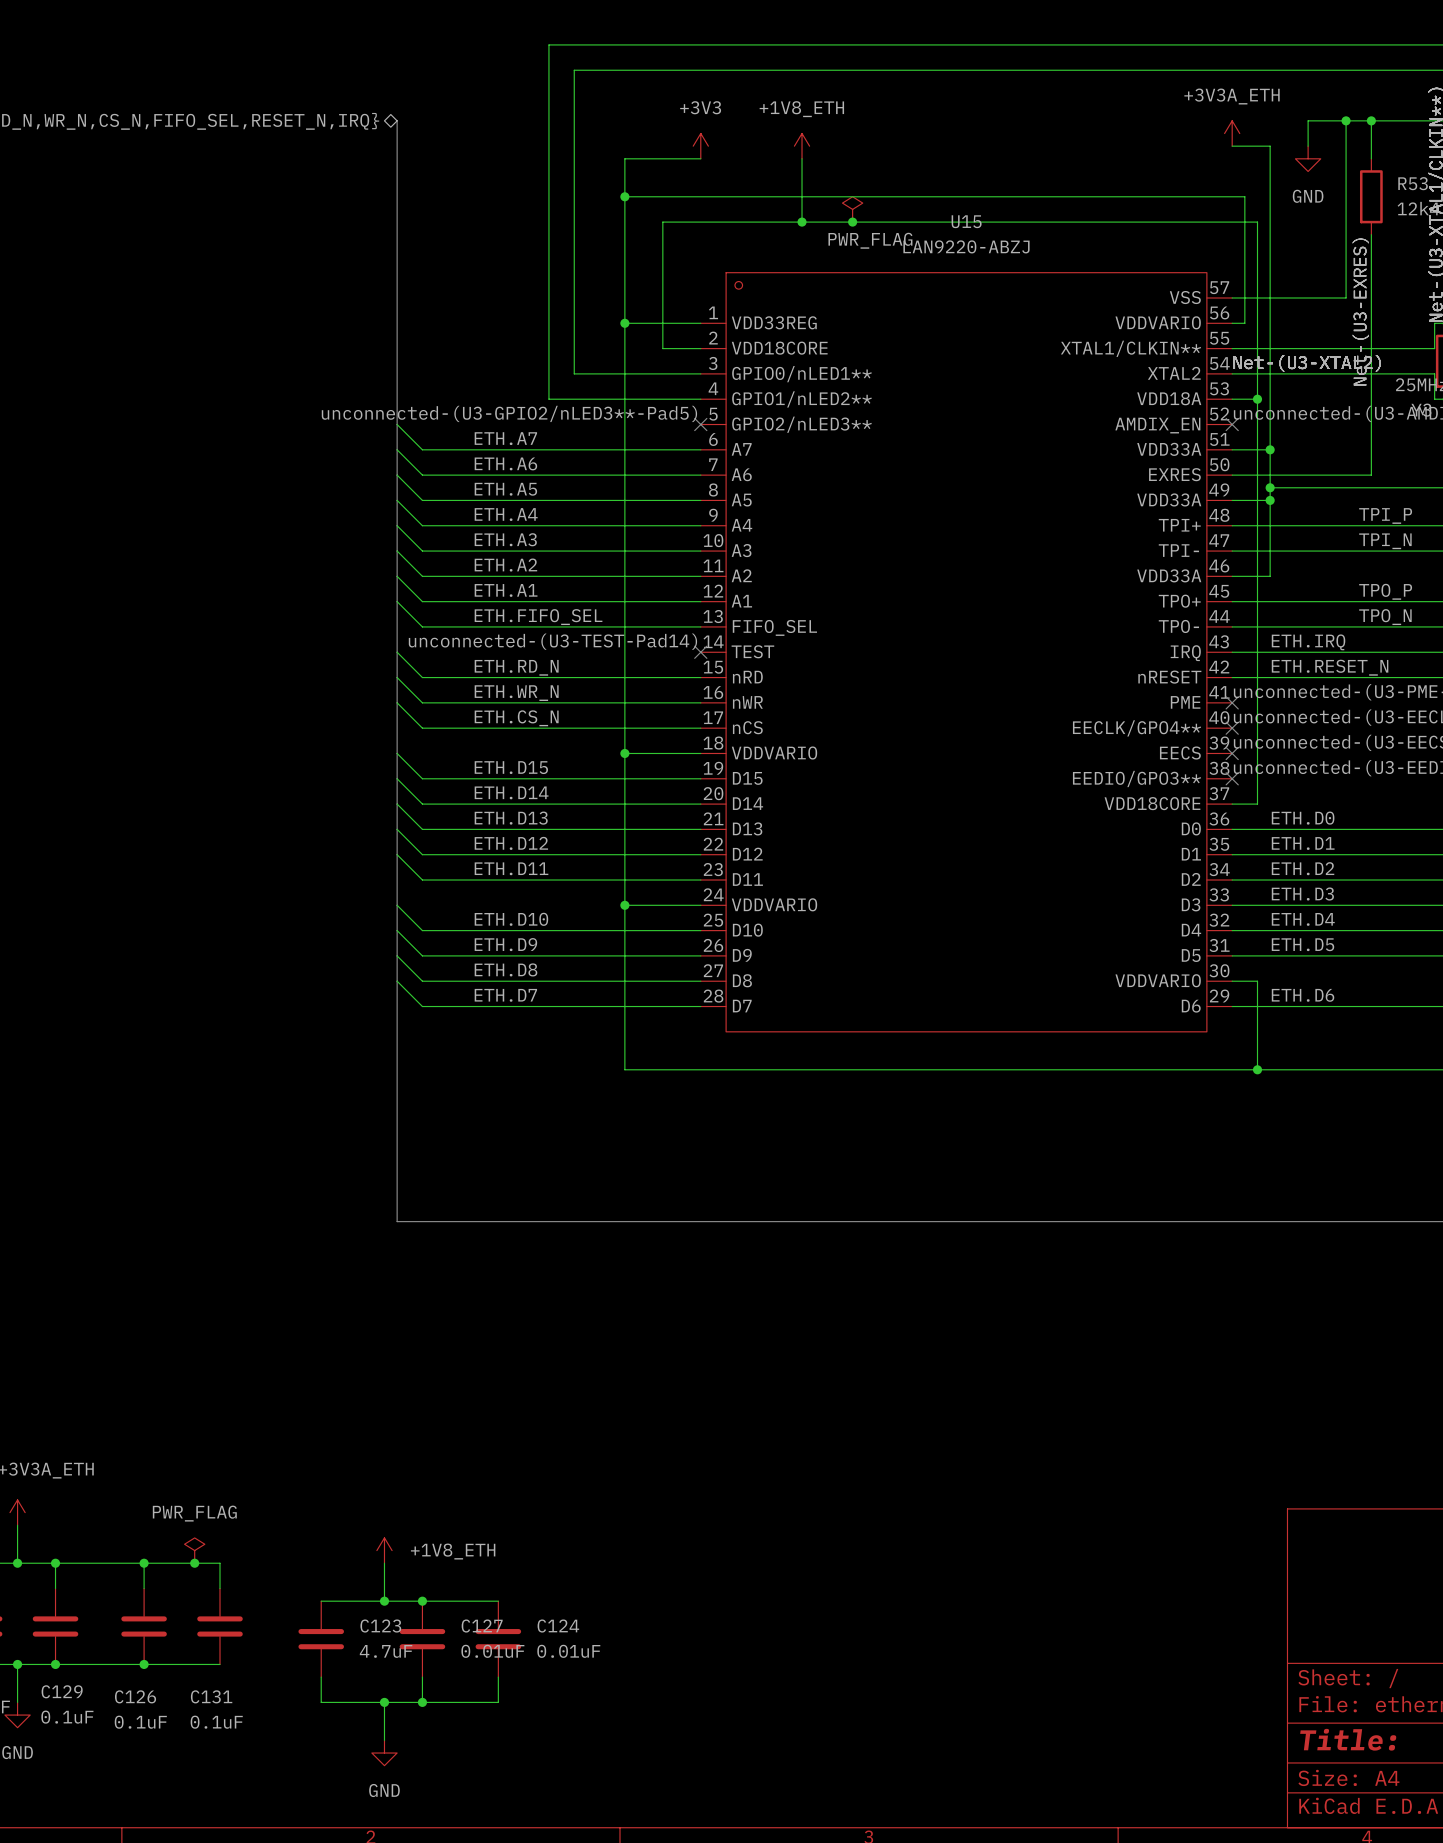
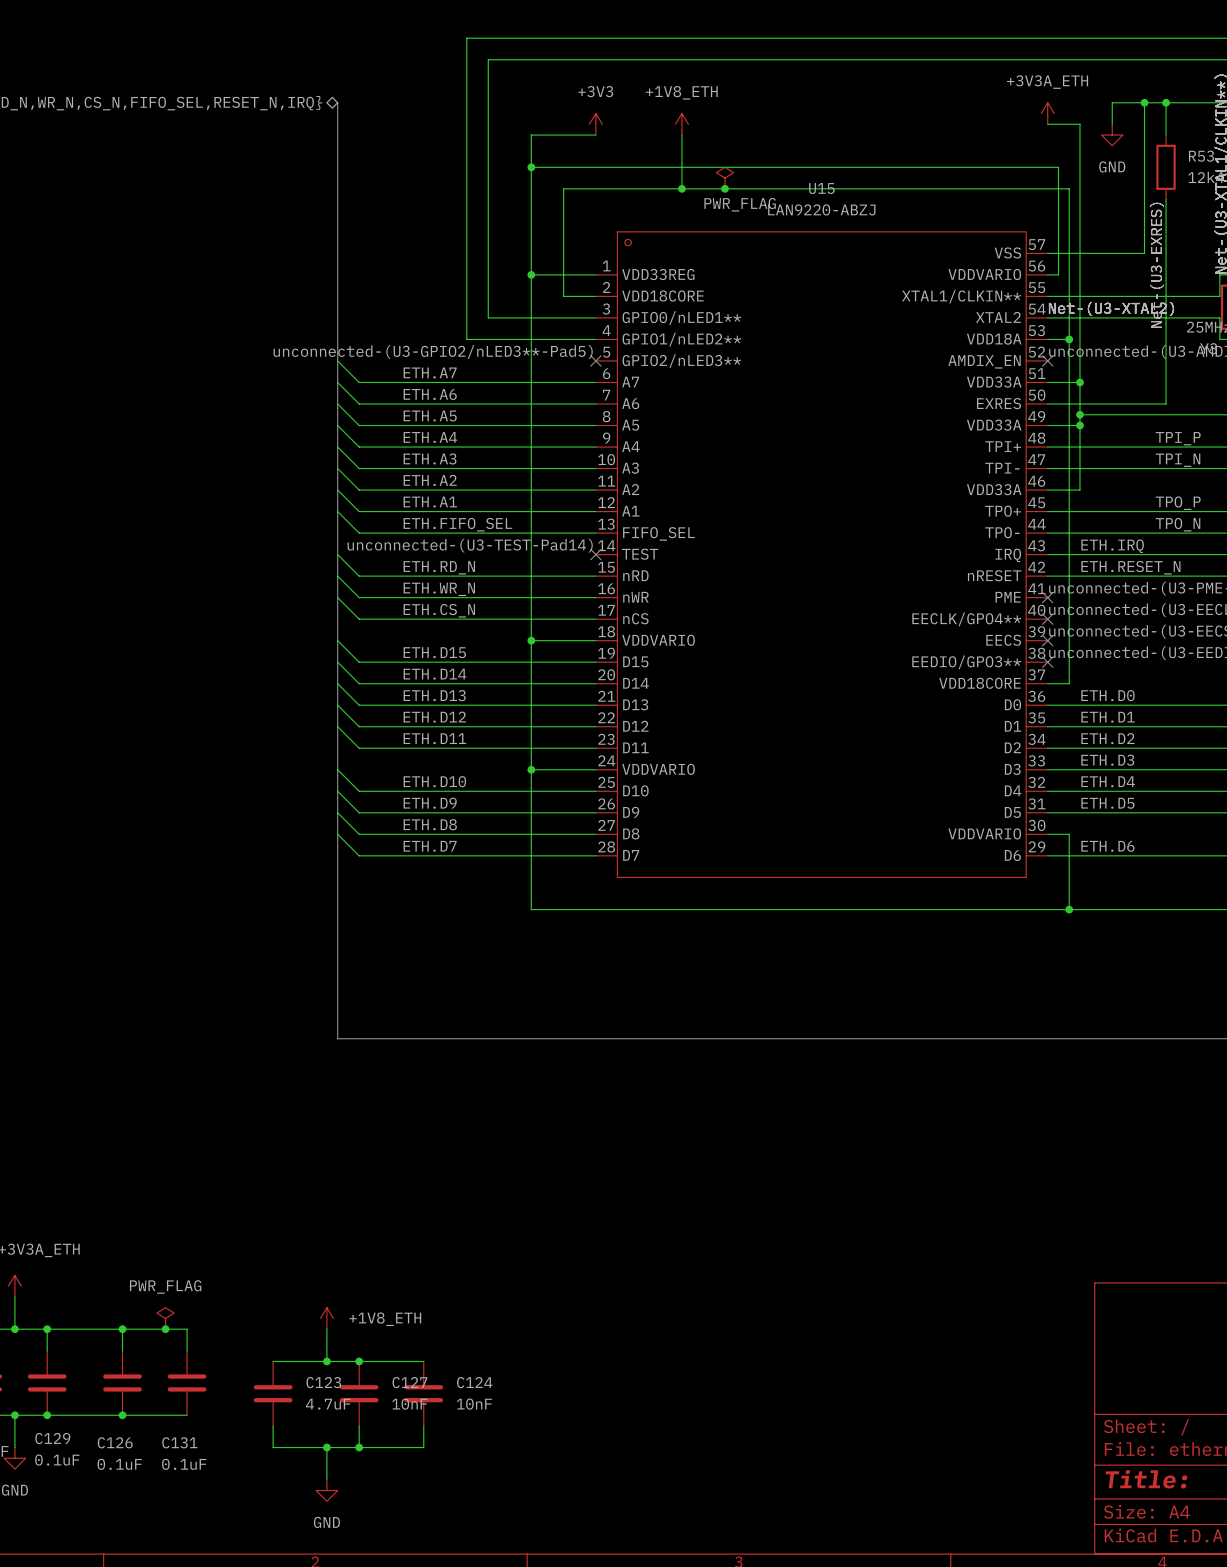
C127 value: 0.01uF (492, 1651) -> 10nF (409, 1404)
C124 value: 0.01uF (568, 1651) -> 10nF (474, 1404)

